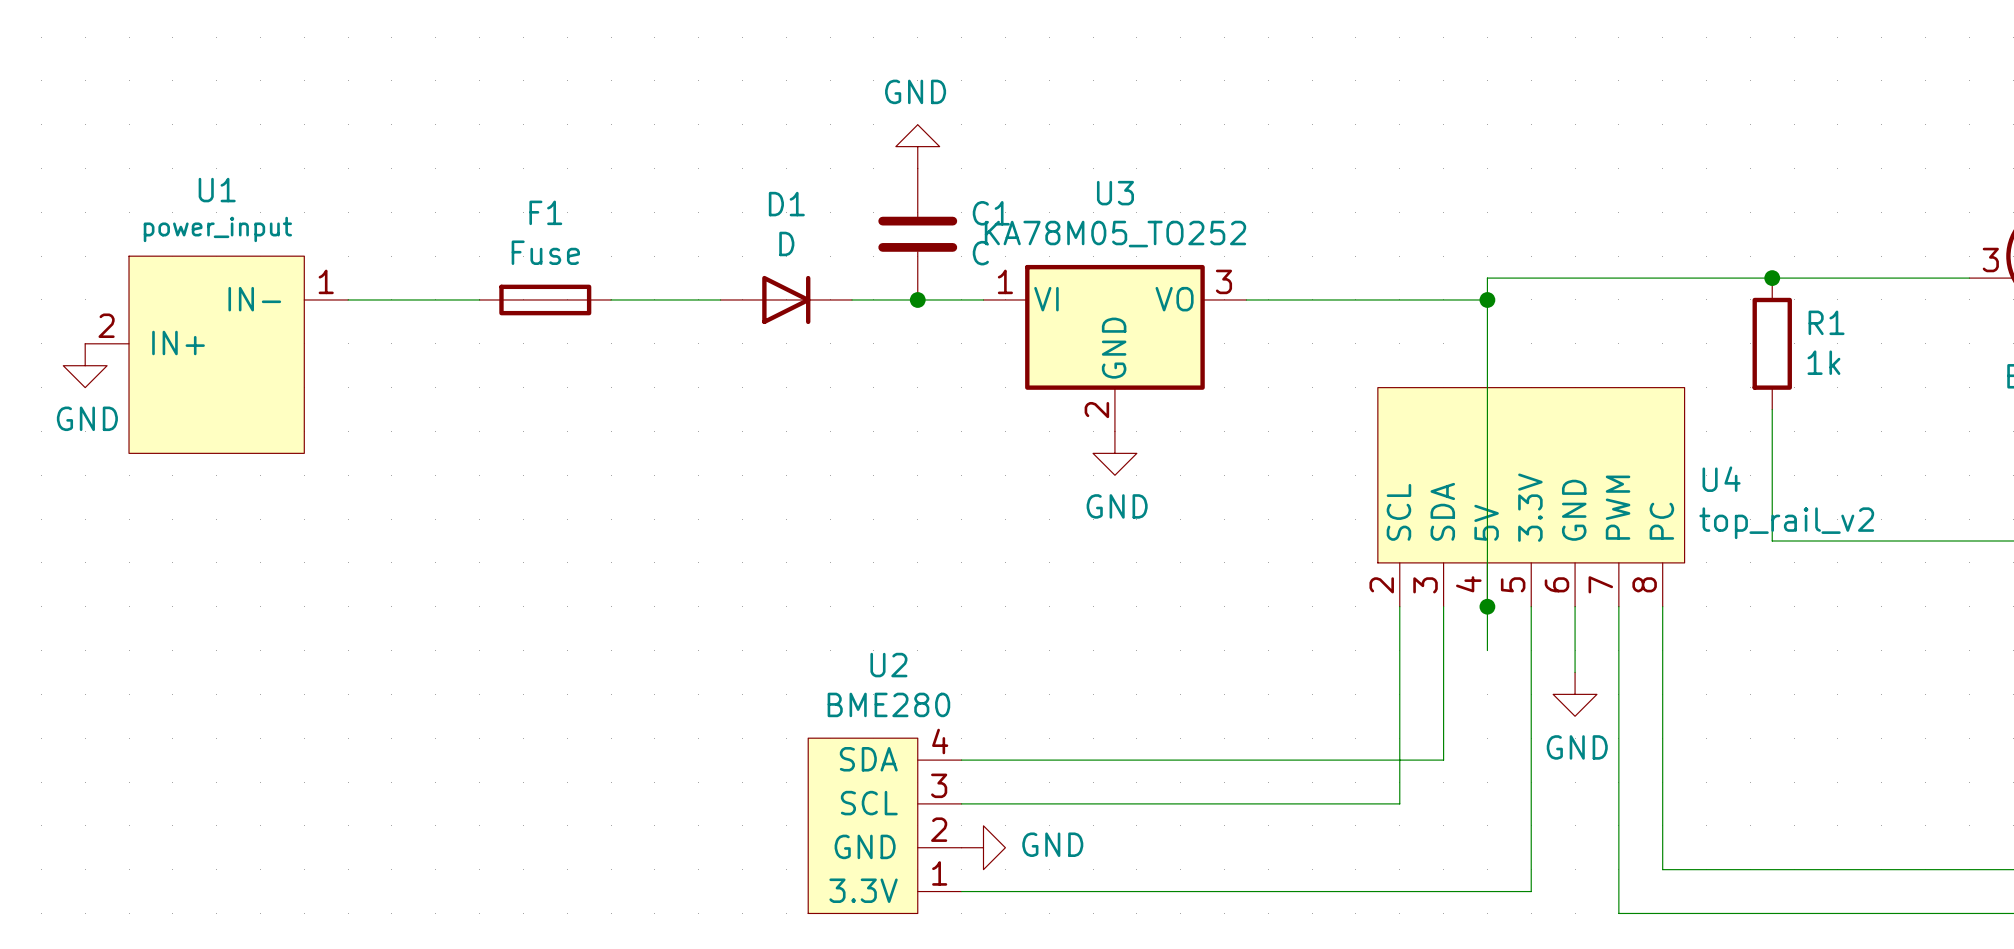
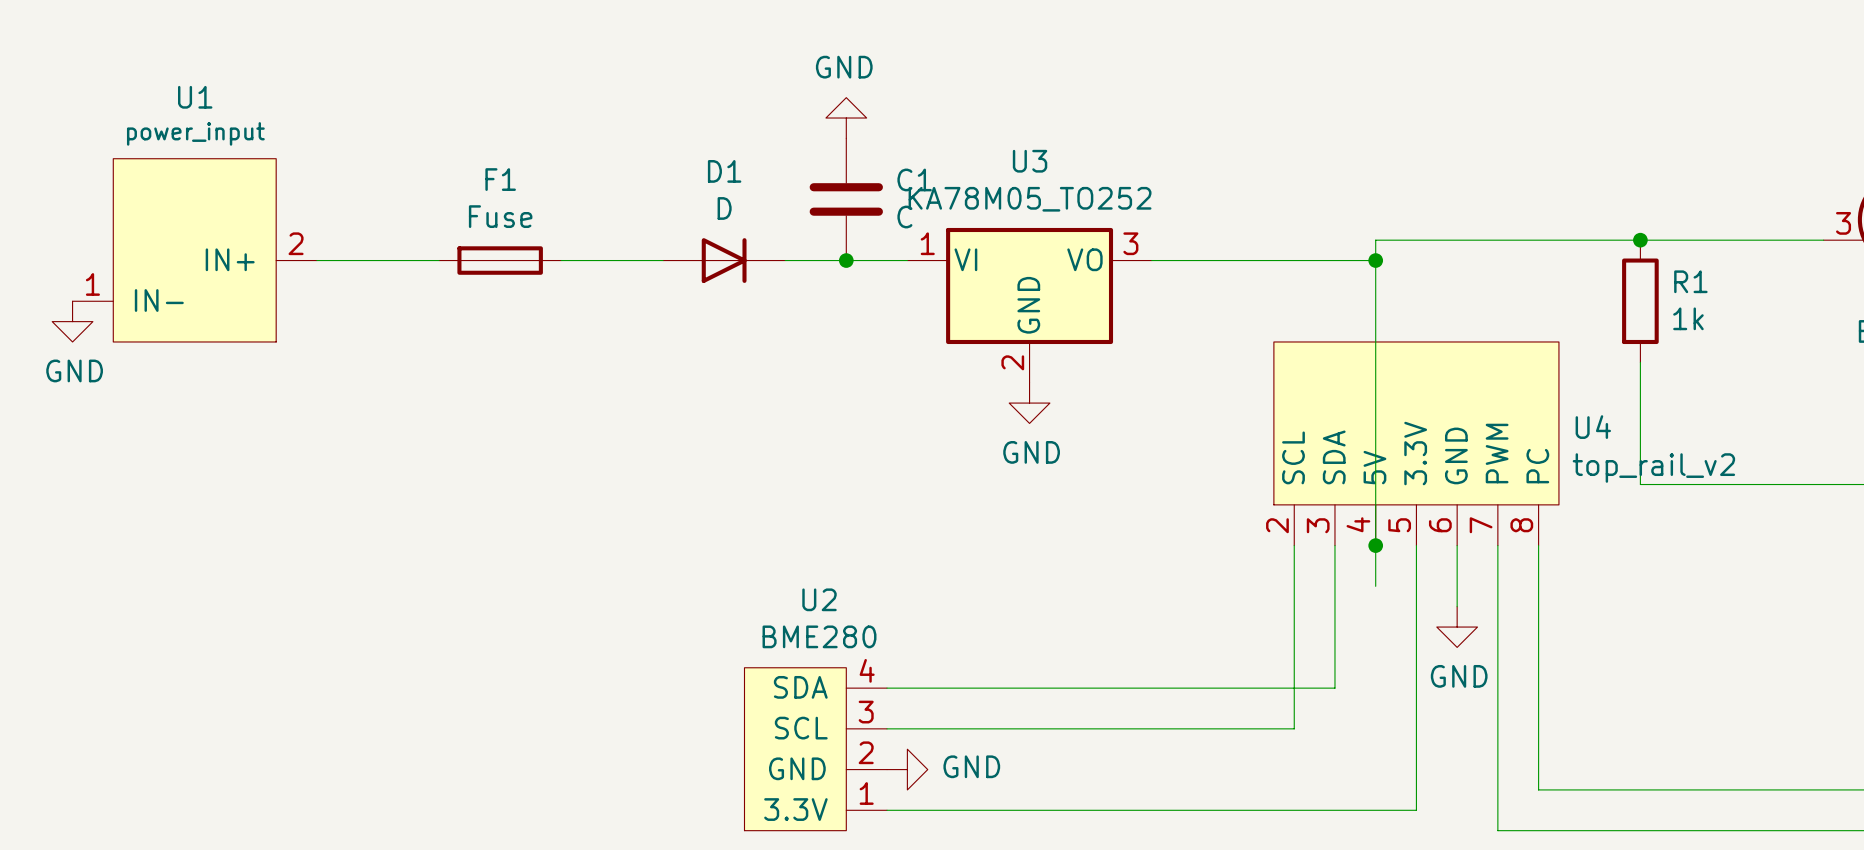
U1 rotation: 0° (216, 354) -> 180° (194, 250)

